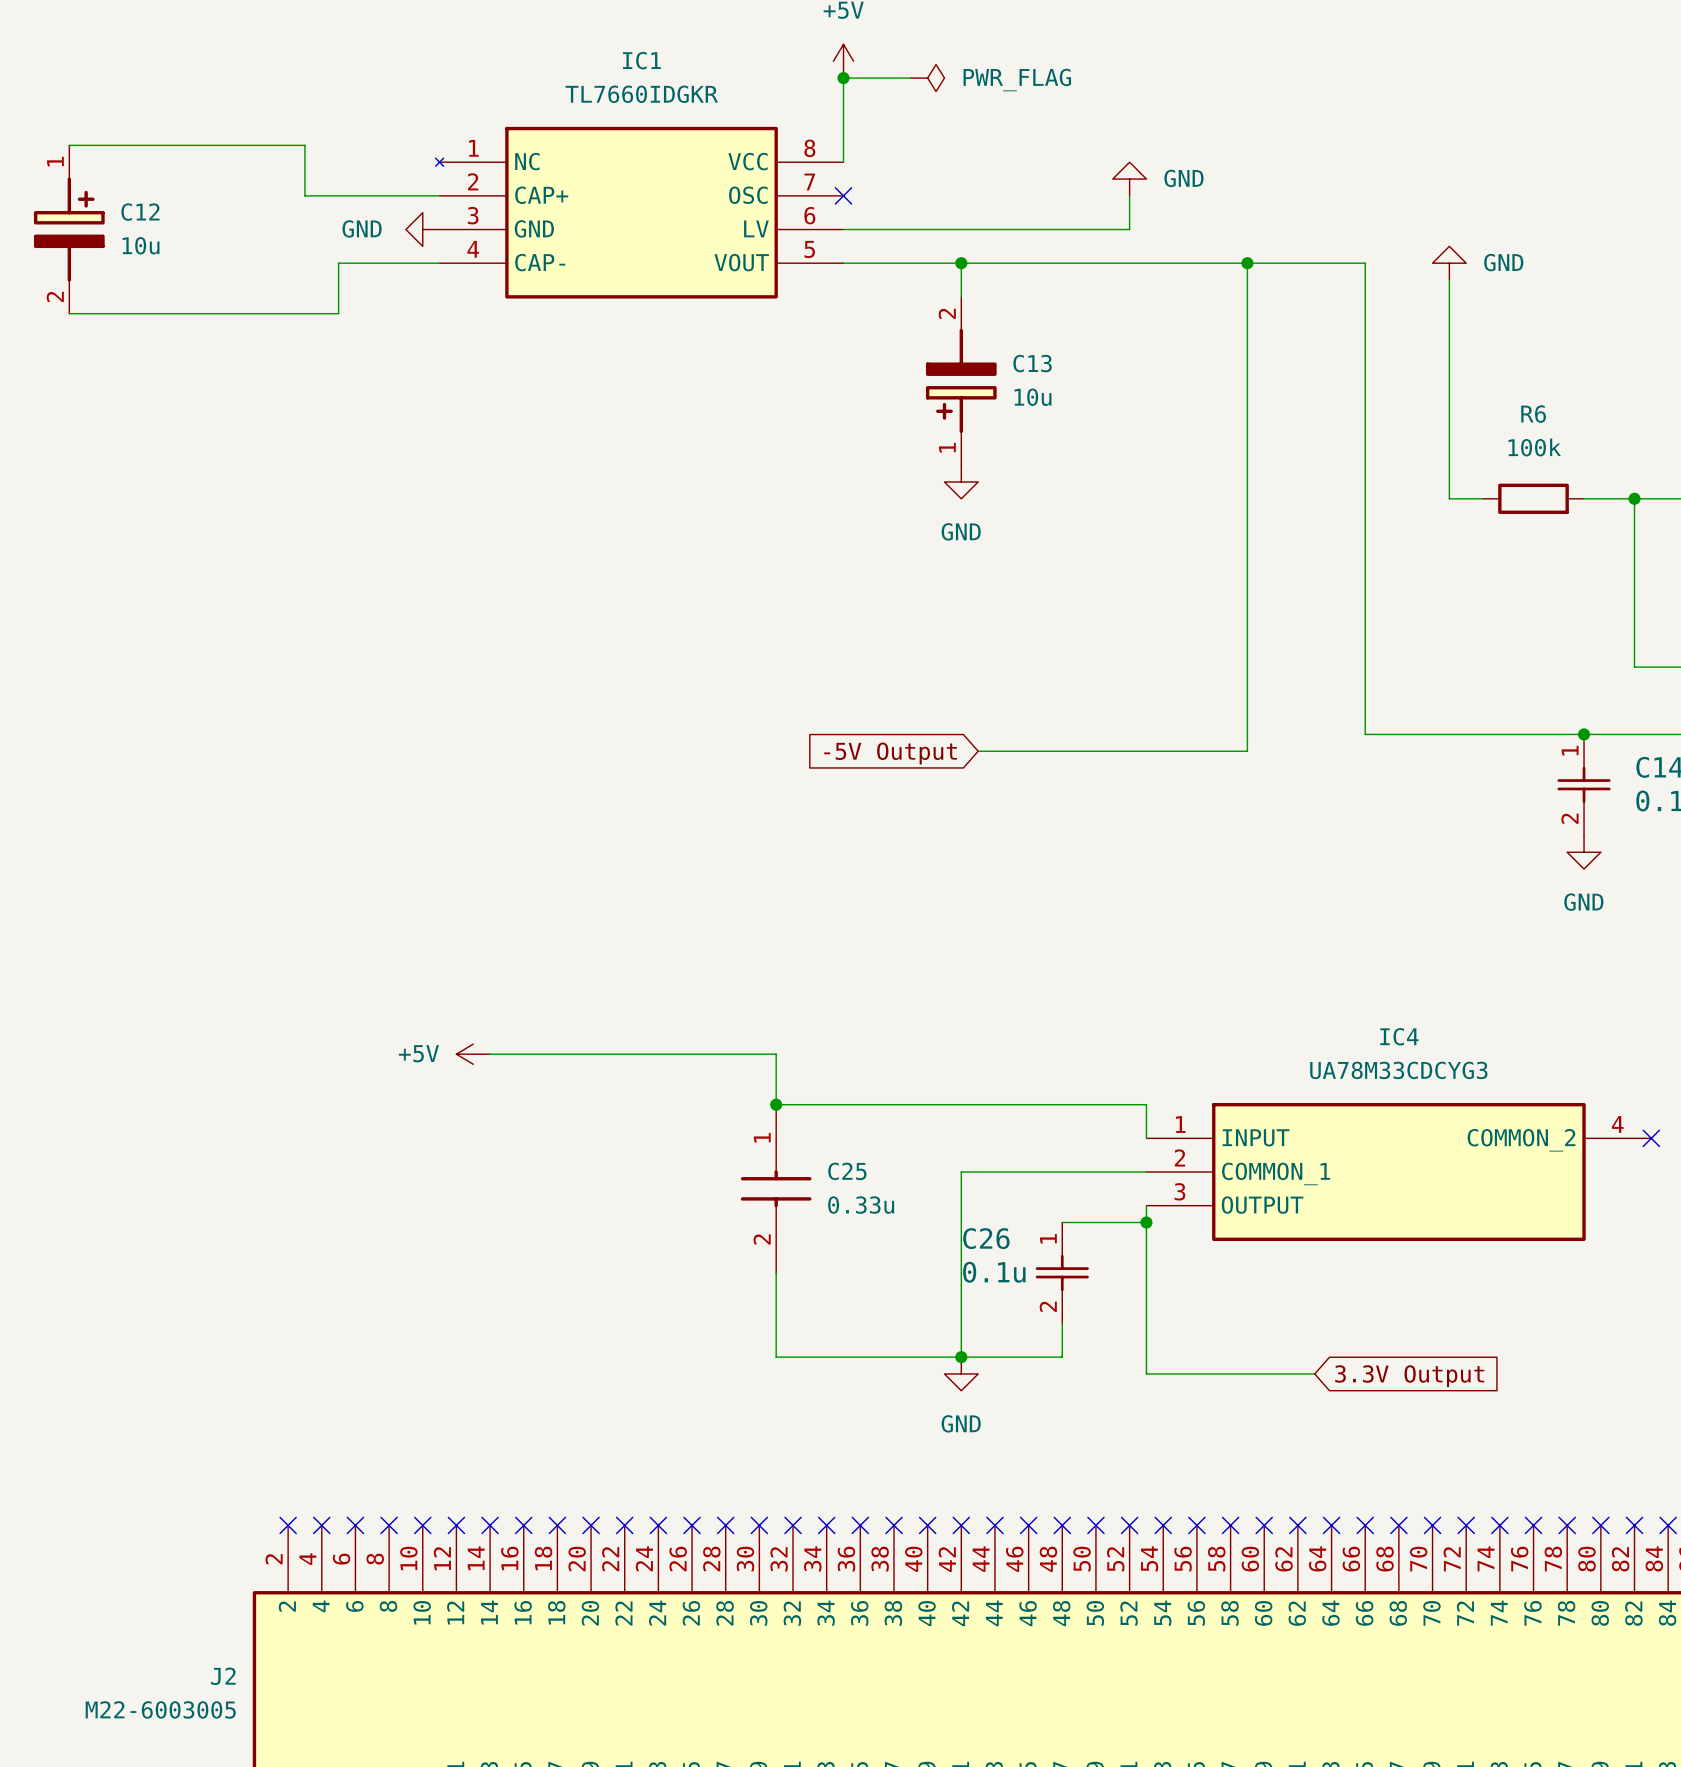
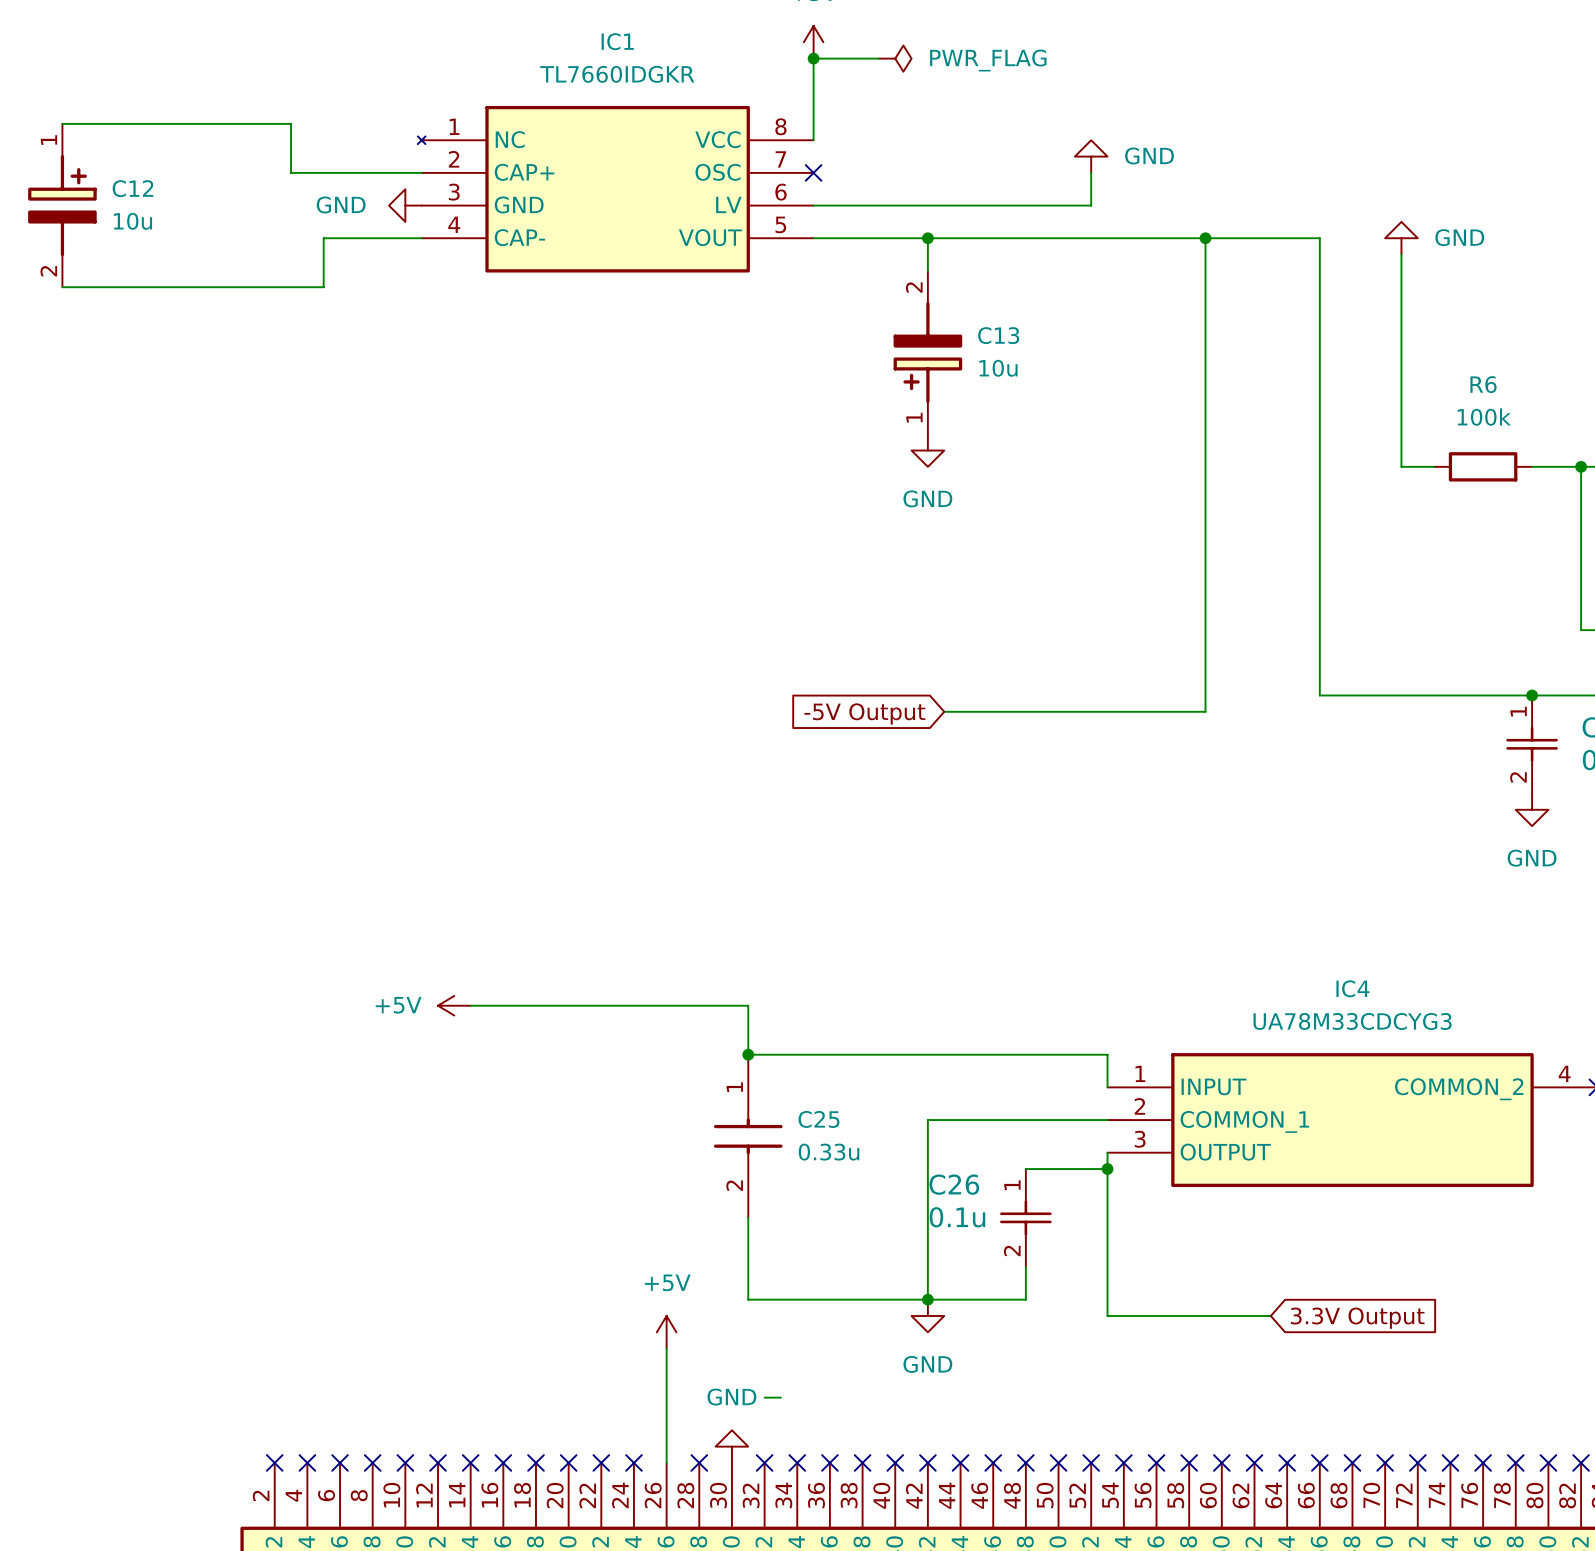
power symbol: none -> +5V (666, 1332)
wire: none -> (666, 1348) (666, 1462)
wire: none -> (764, 1397) (780, 1397)
power symbol: none -> GND (731, 1446)
no-connect mark: (692, 1525) -> none
no-connect mark: (759, 1525) -> none

